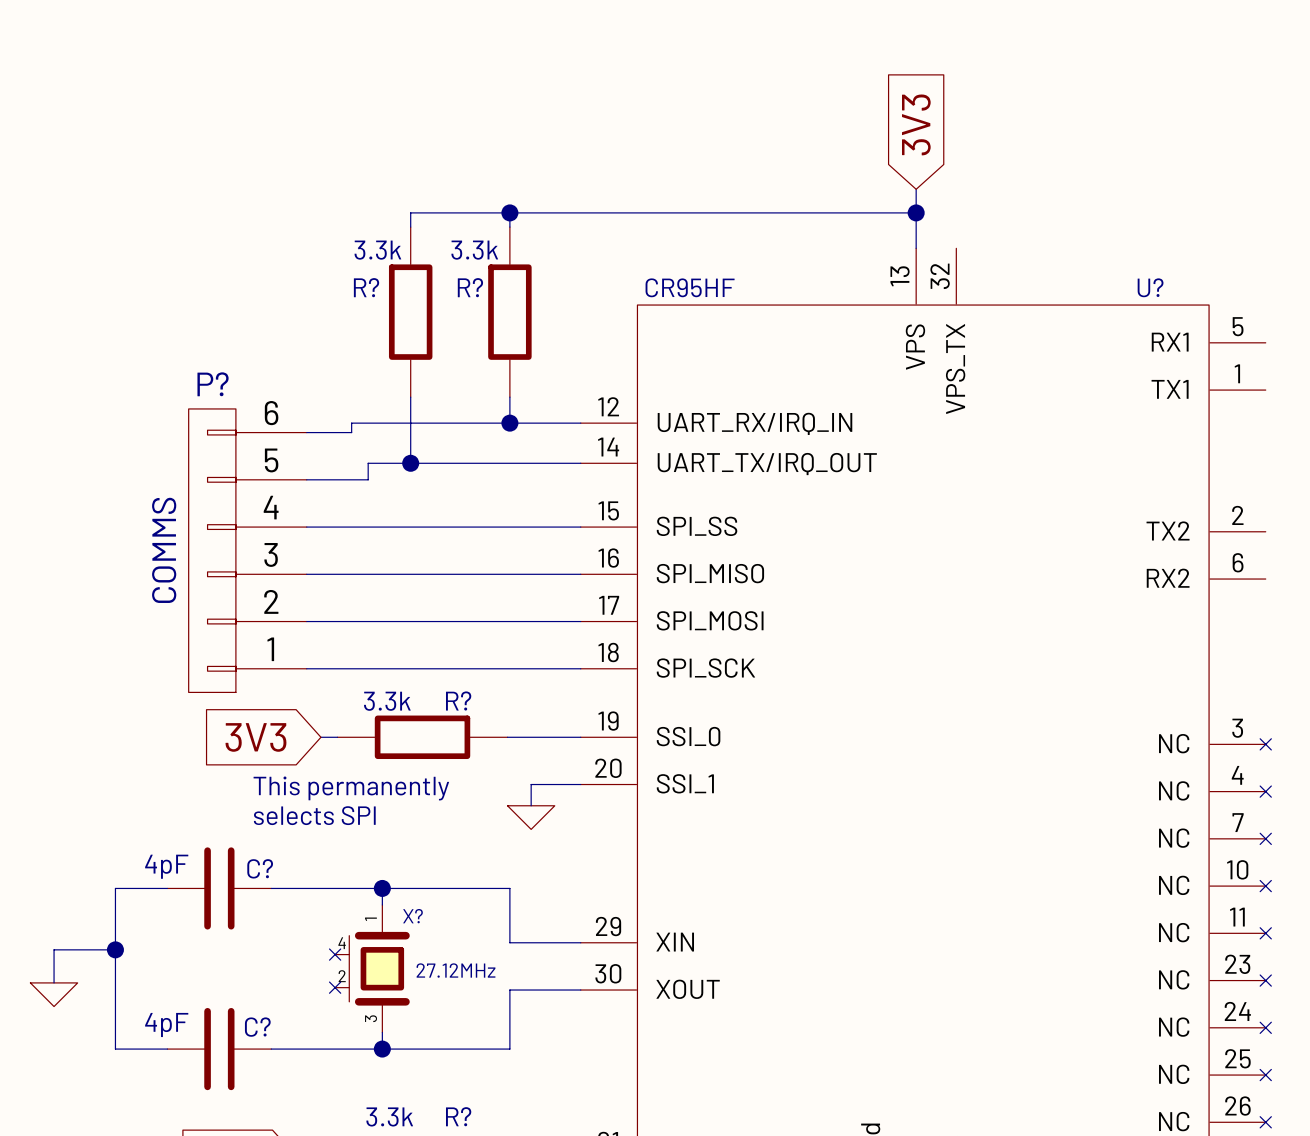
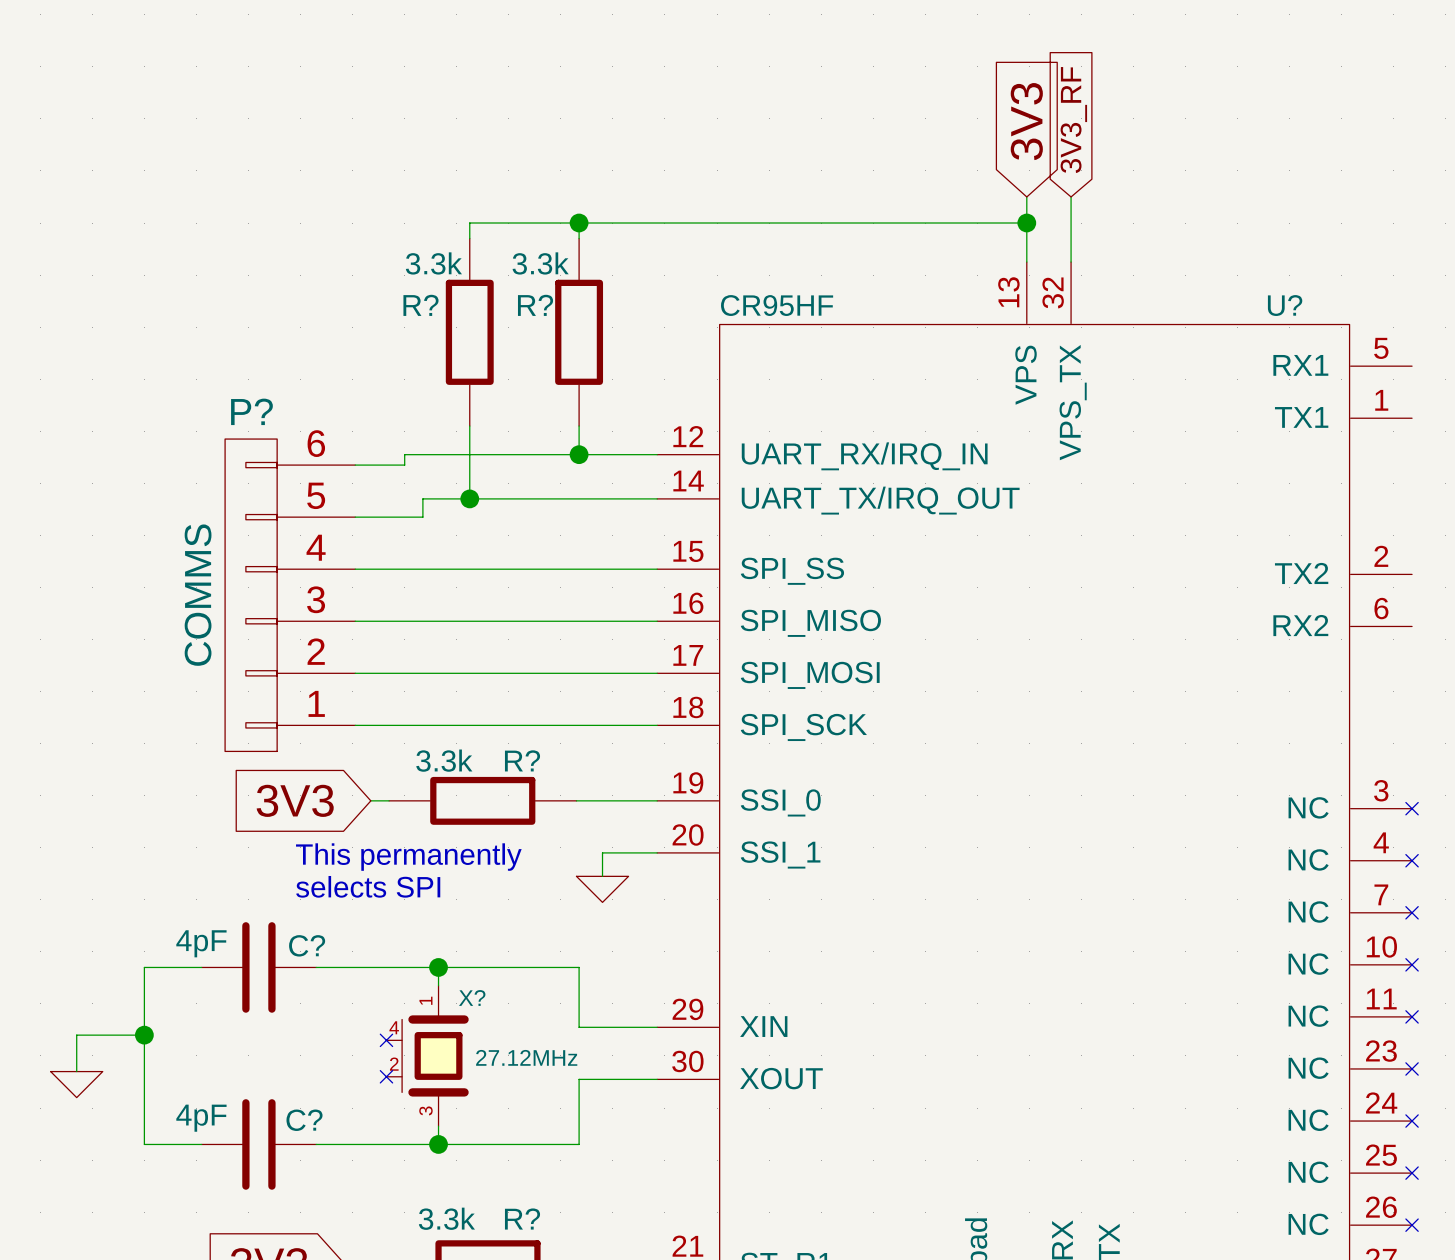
global label: none -> 3V3_RF (1073, 120)
wire: none -> (1071, 196) (1071, 262)

